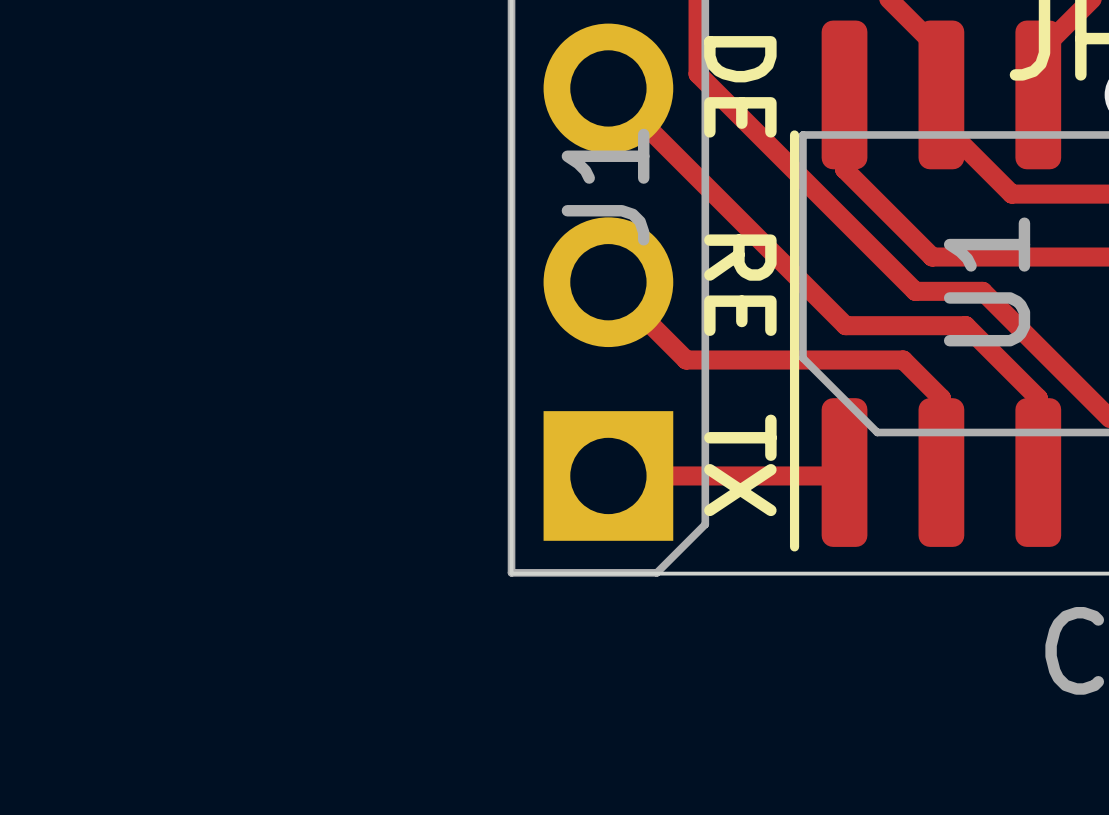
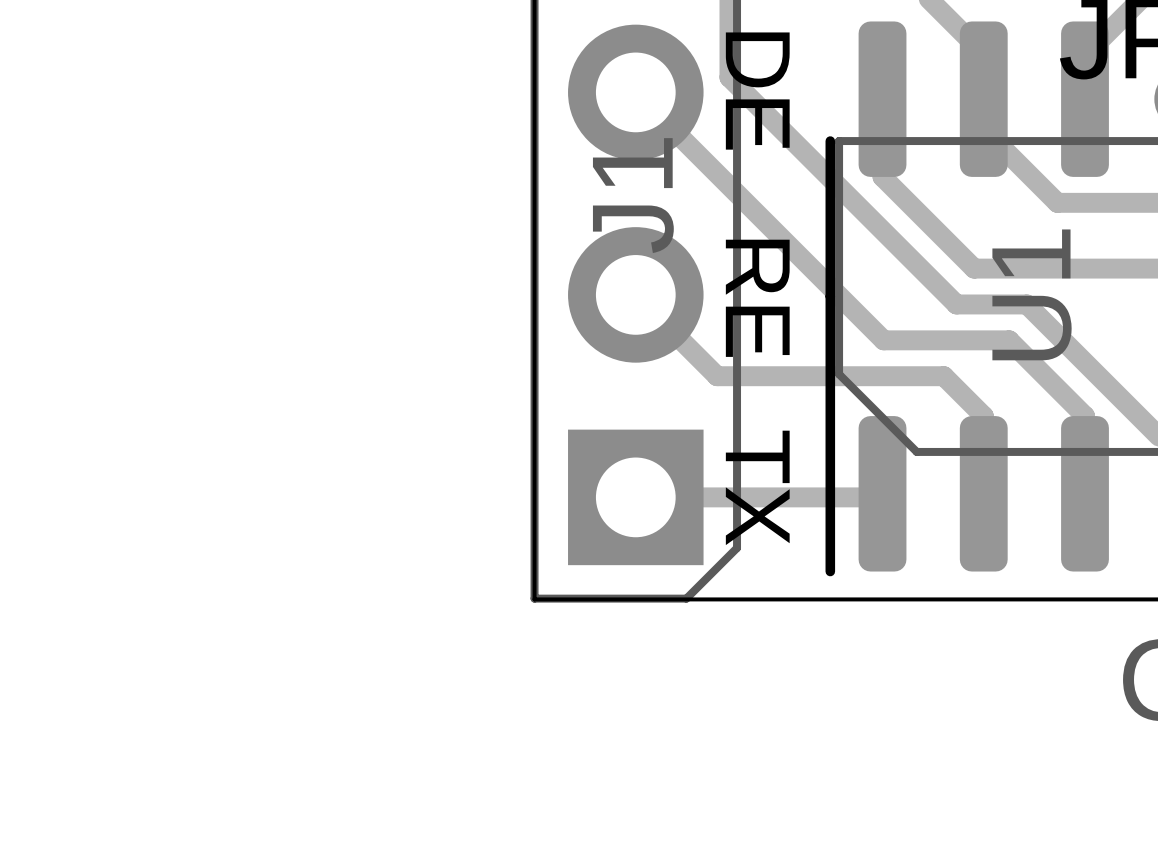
text position: DE (740, 86) -> DE (757, 91)
text position: RE (740, 285) -> RE (757, 298)
text position: TX (740, 465) -> TX (757, 487)

